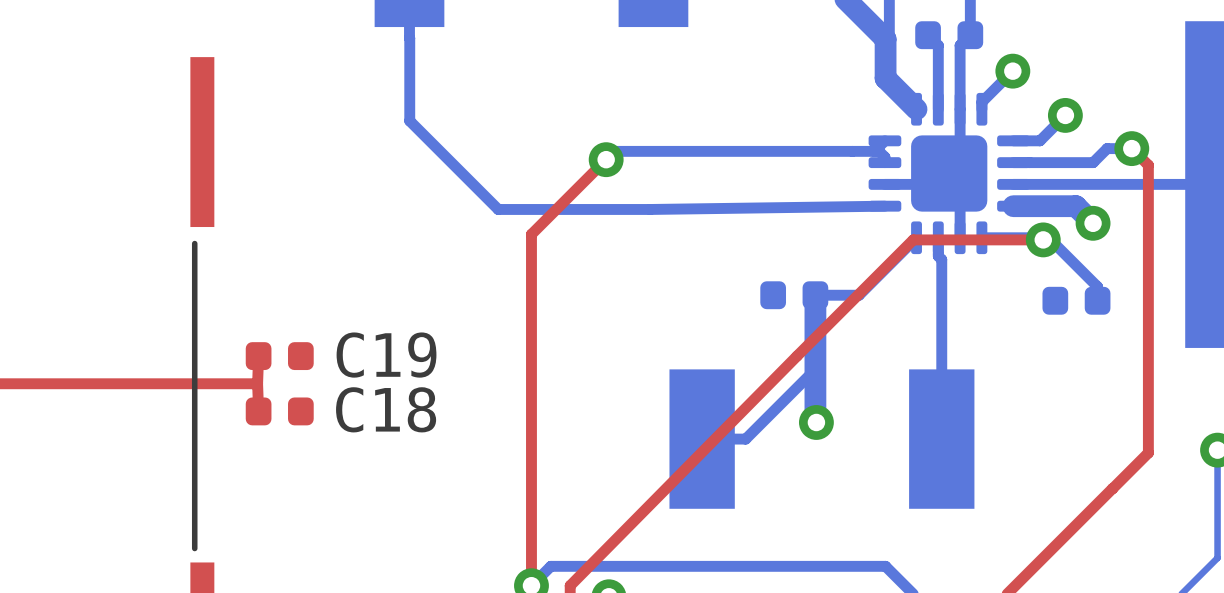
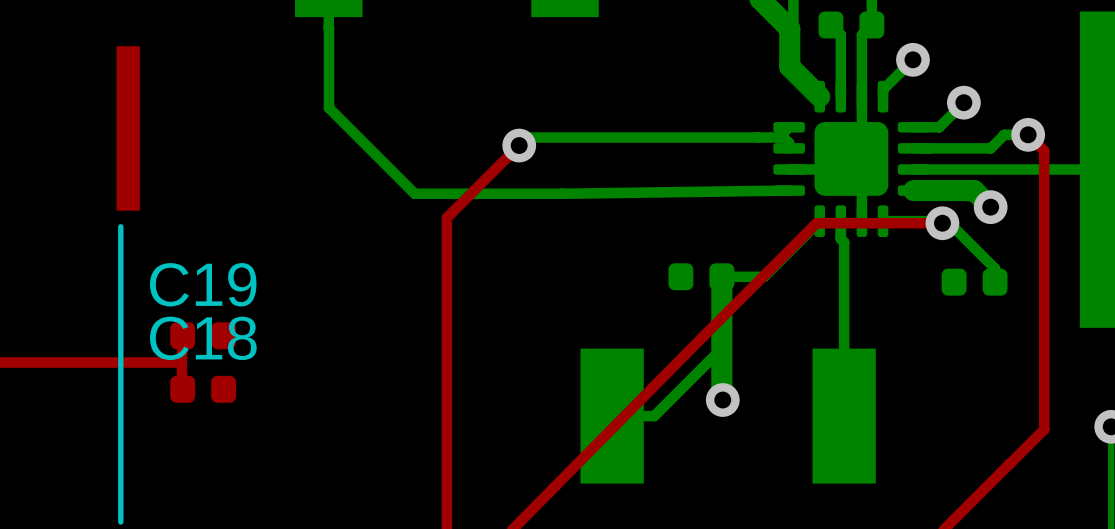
C19 name position: C19 (386, 355) -> C19 (203, 284)
C18 name position: C18 (386, 409) -> C18 (203, 338)

